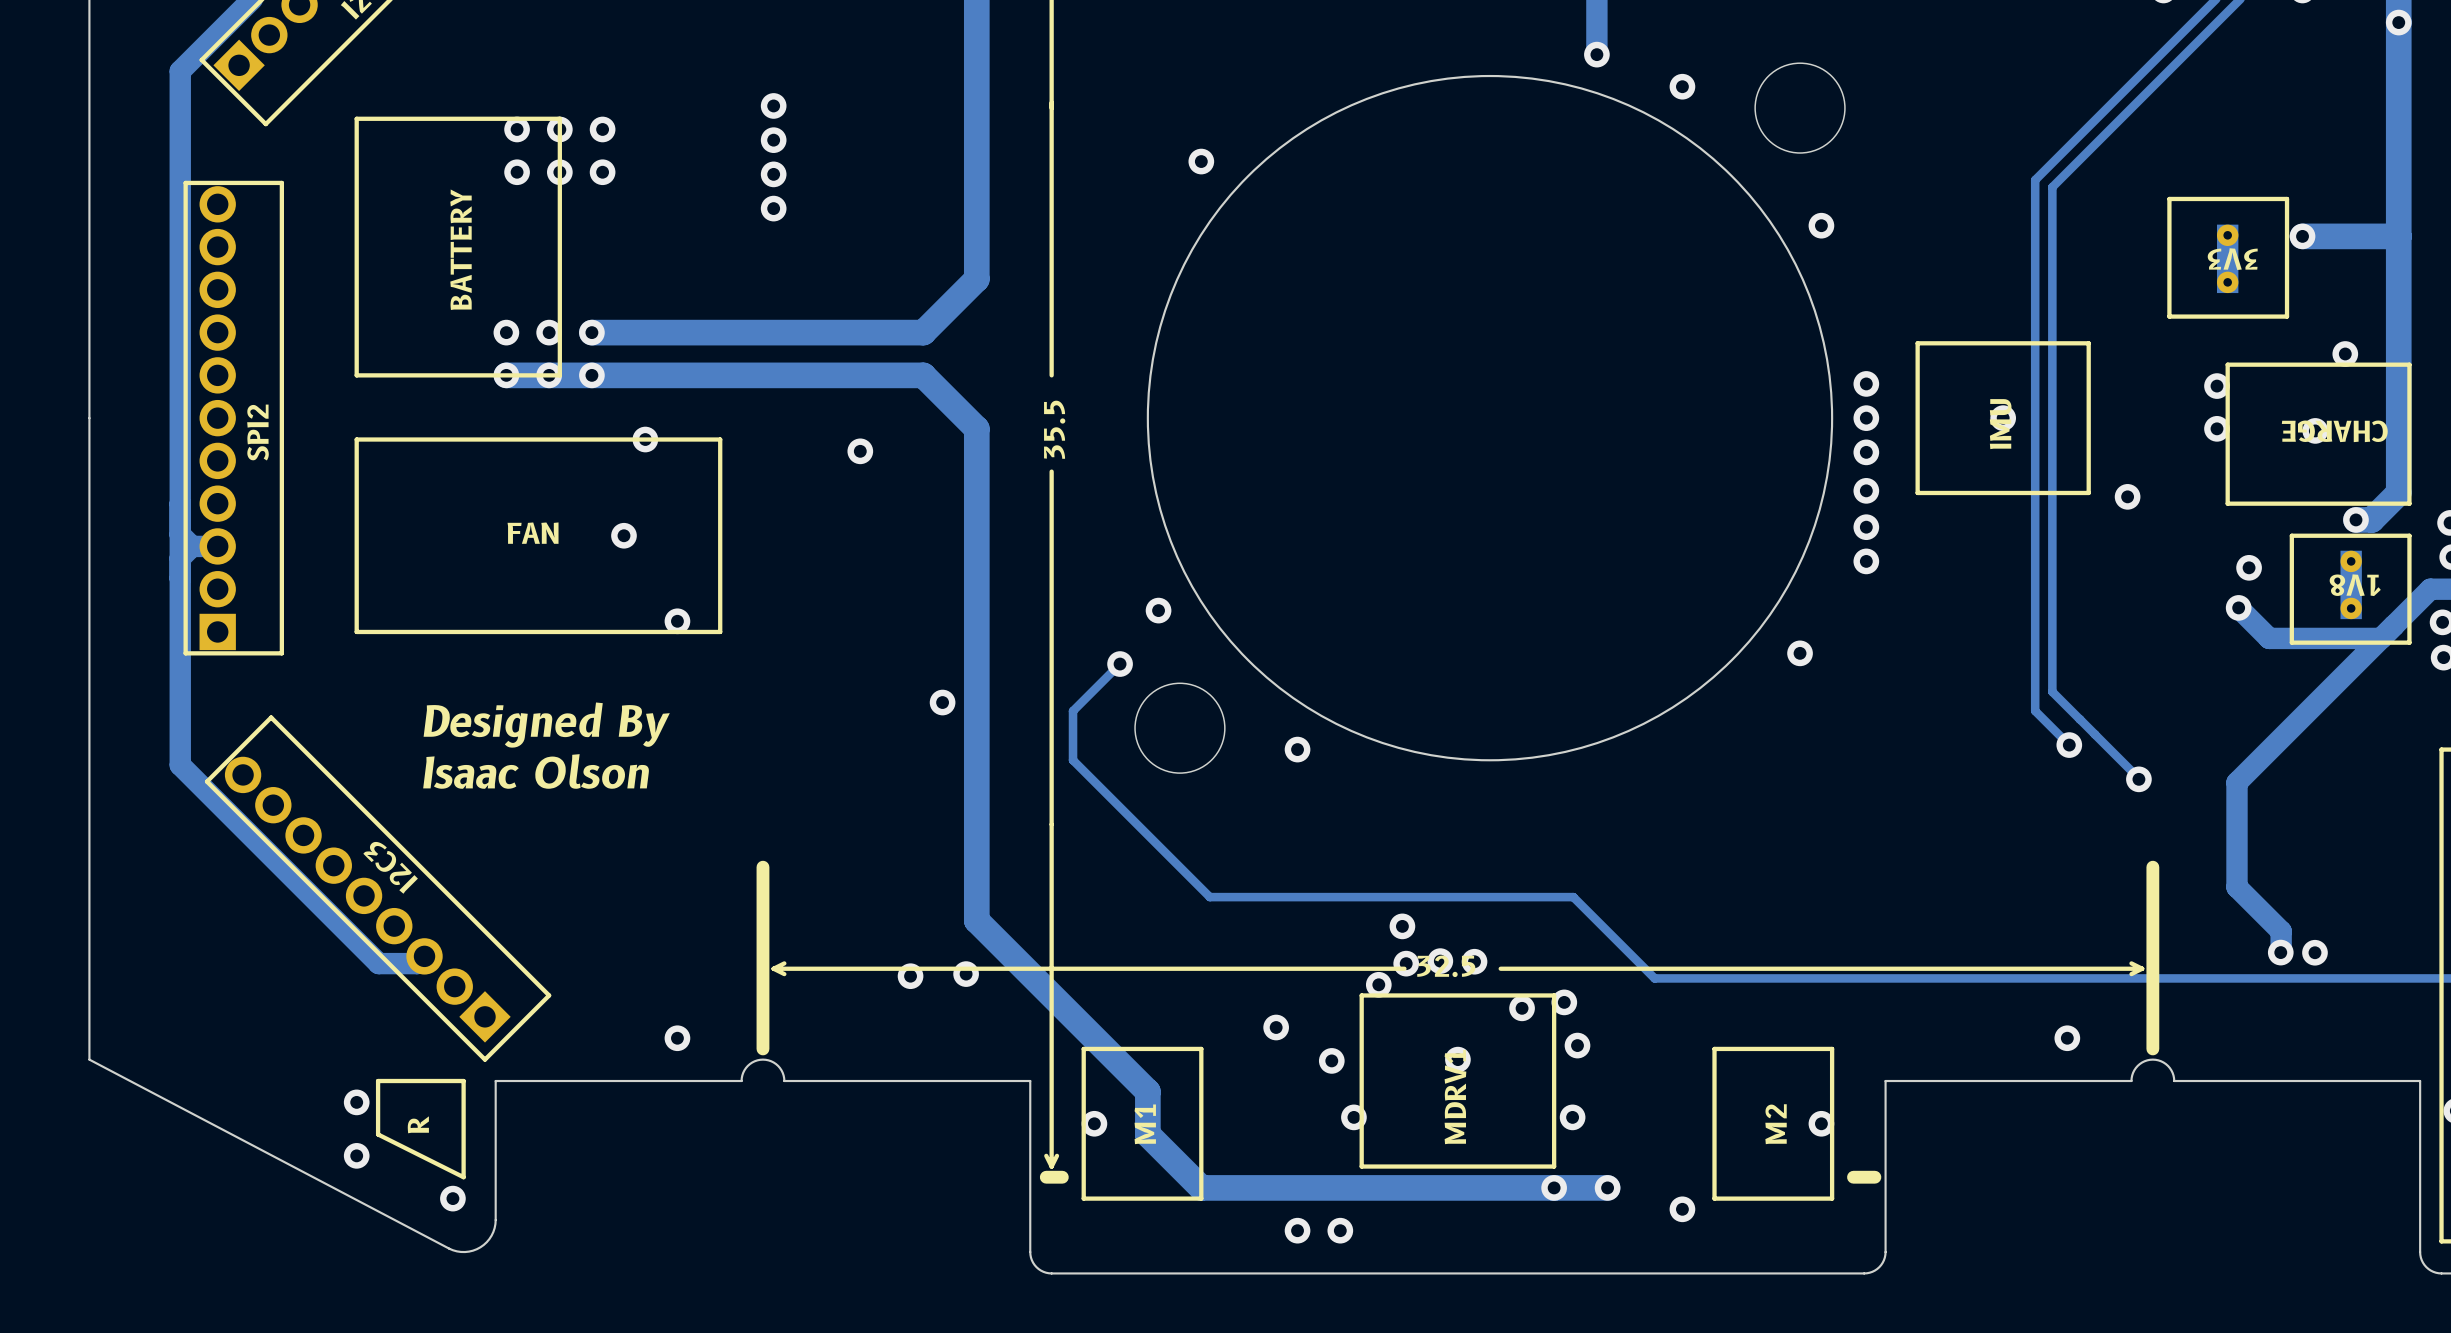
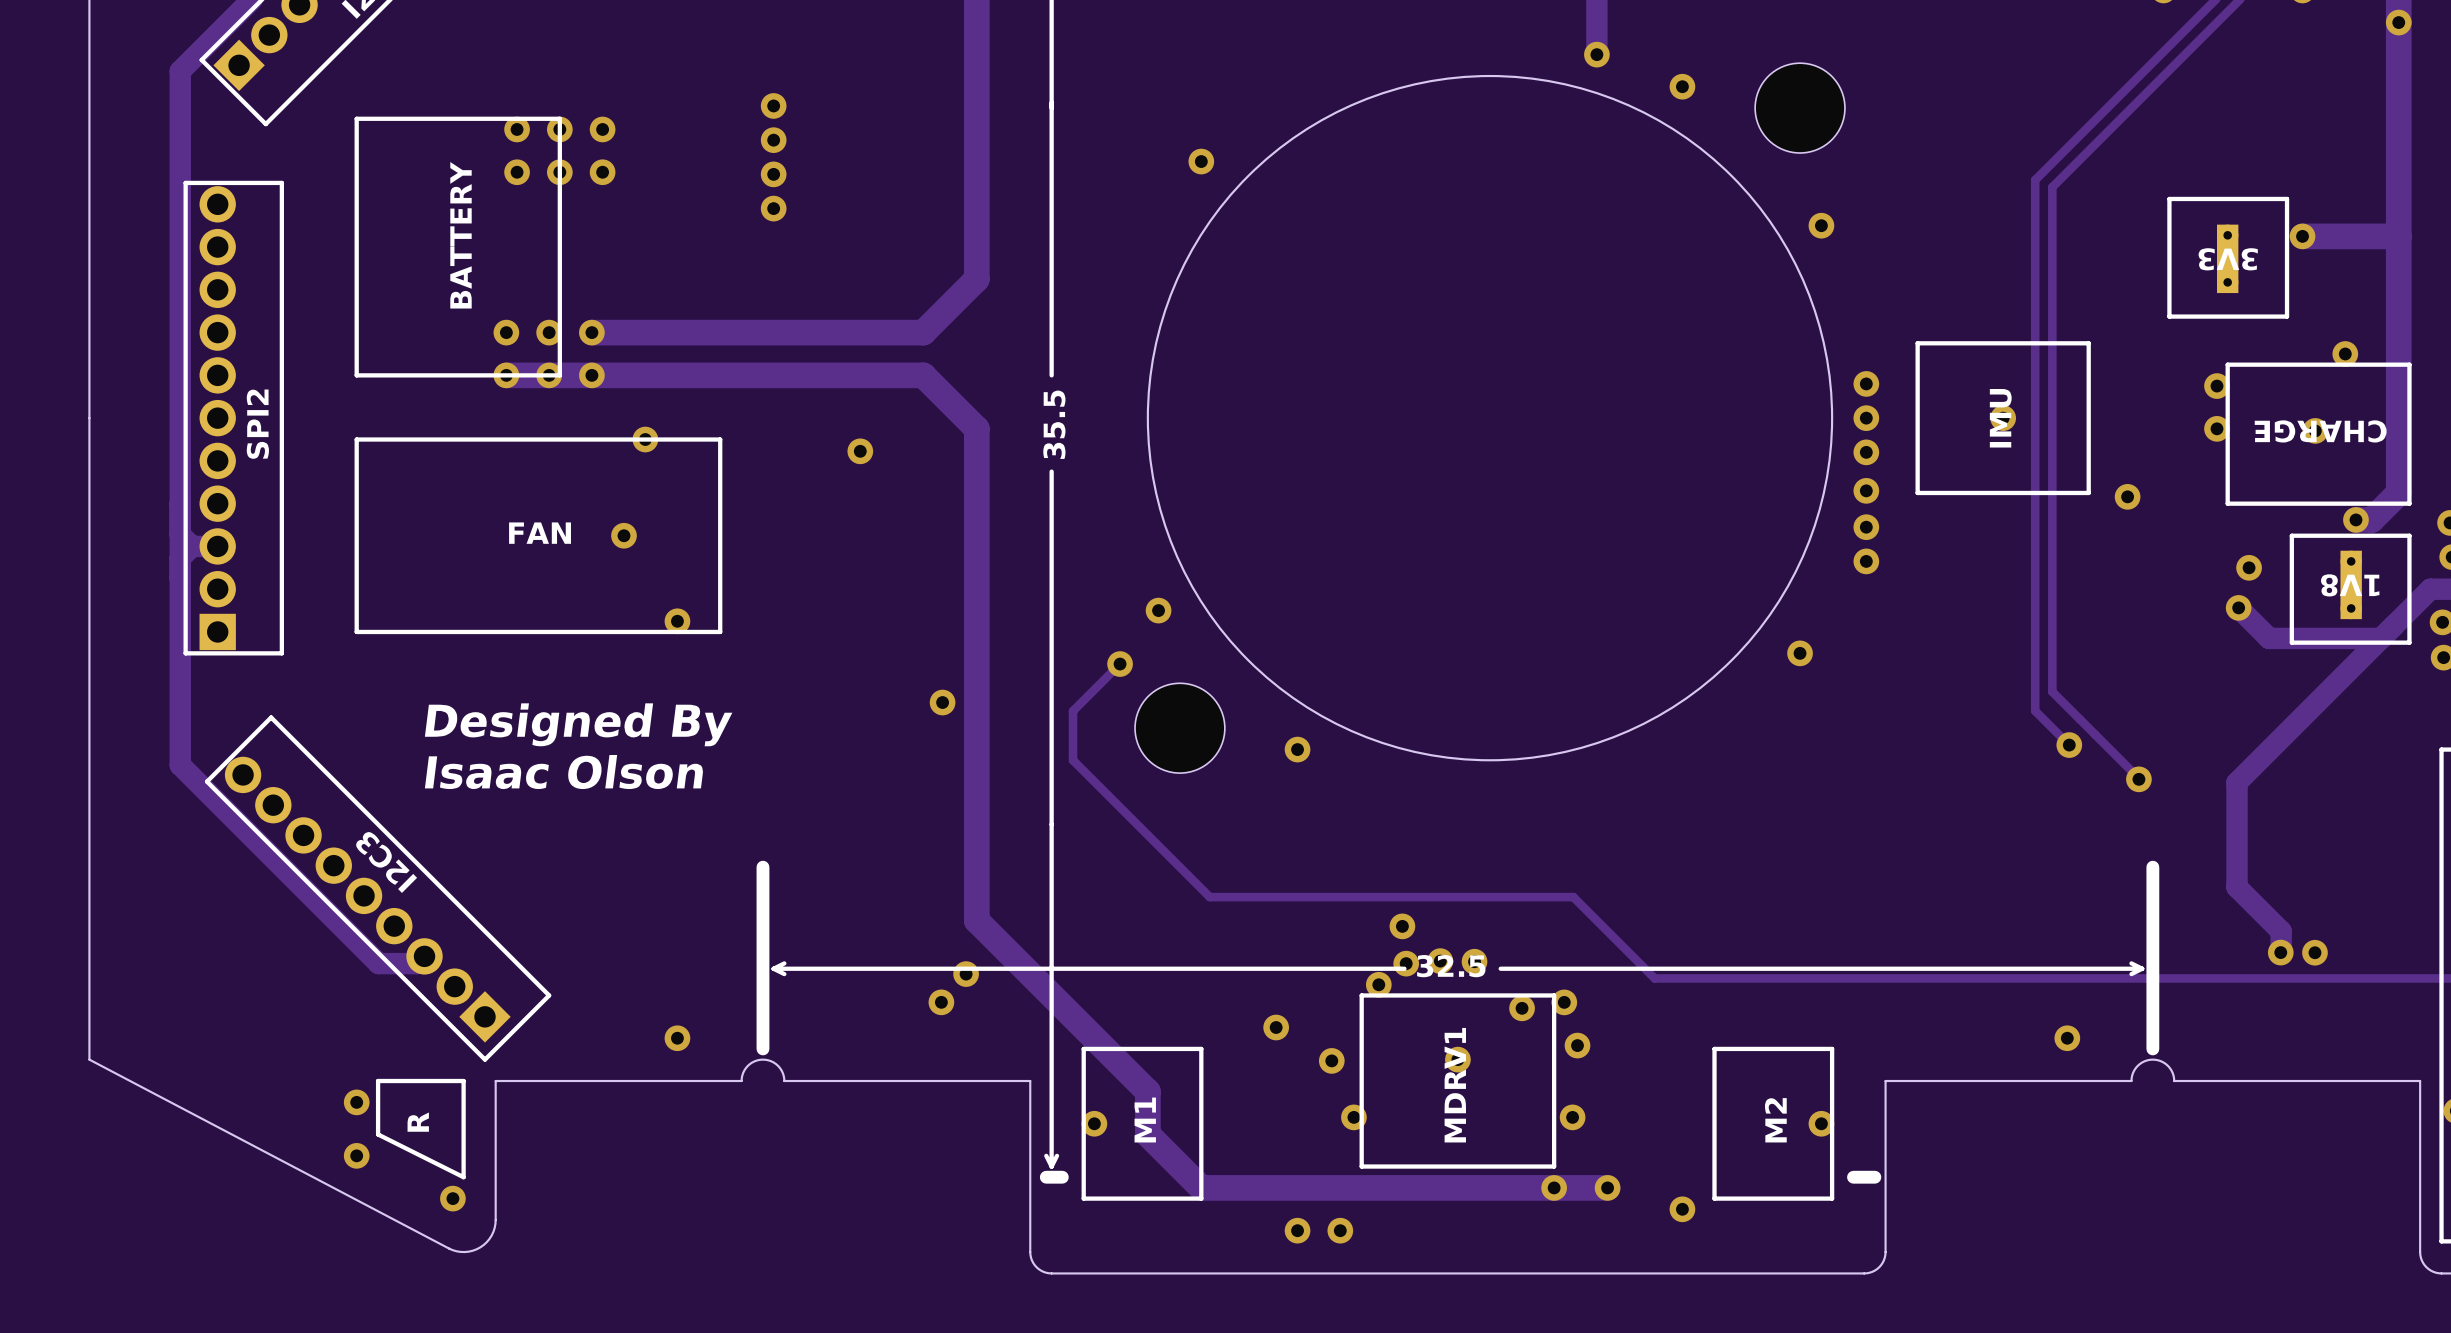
via position: (910, 976) -> (941, 1002)

